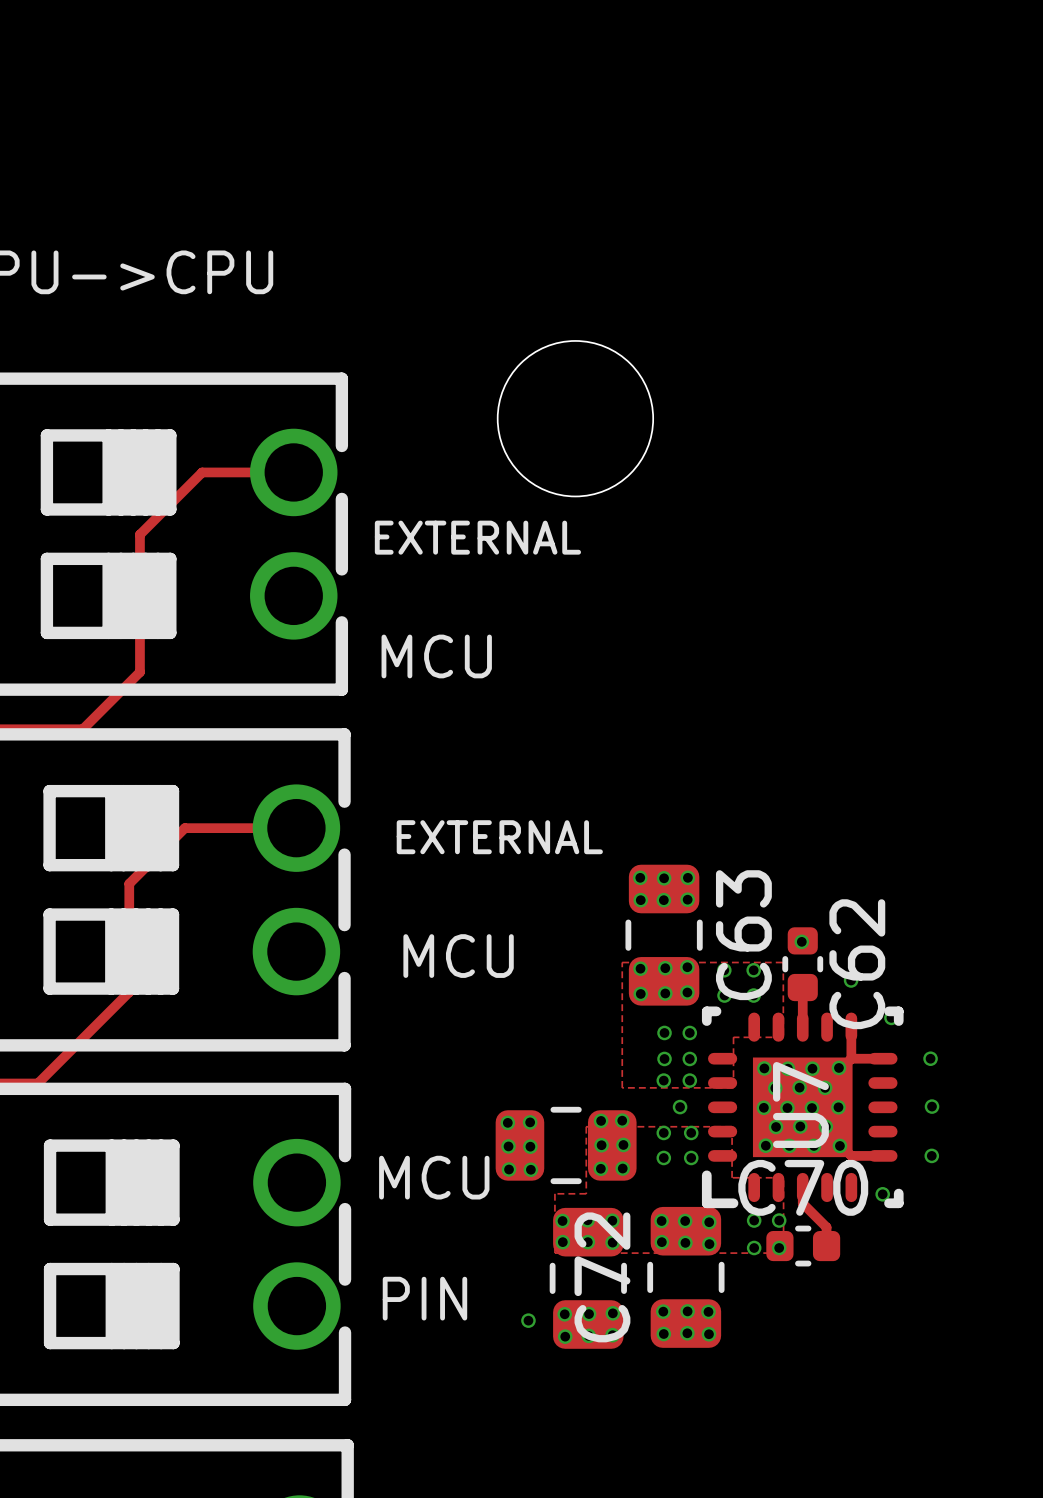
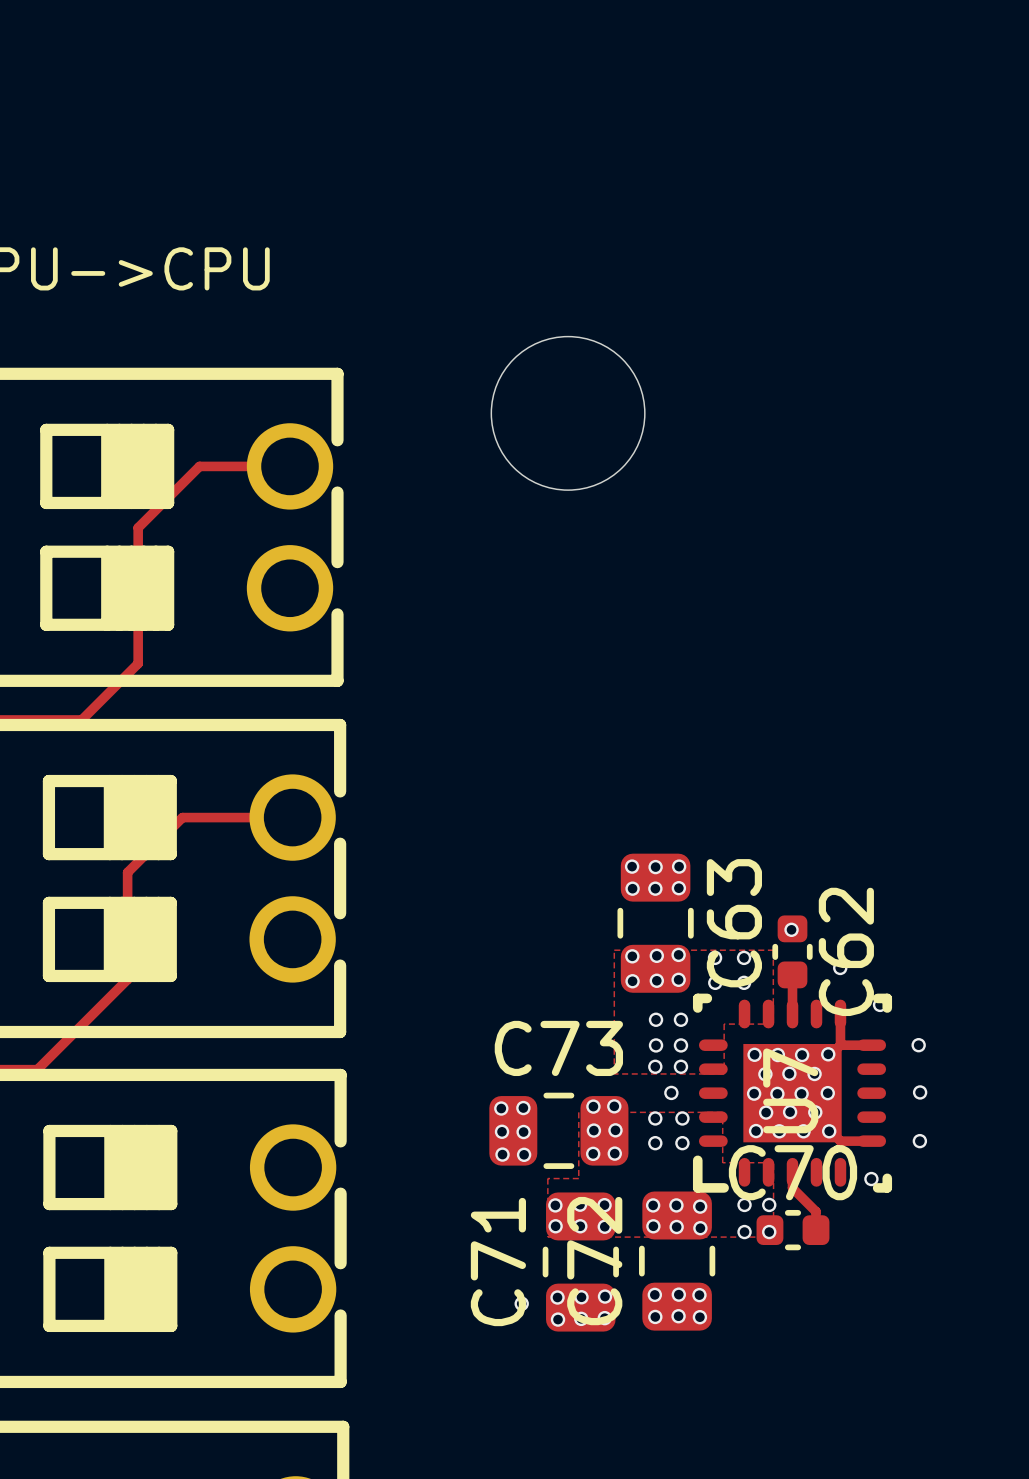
text: EXTERNAL (477, 537) -> none
text: MCU (436, 656) -> none
text: EXTERNAL (499, 837) -> none
text: MCU (458, 956) -> none
C73 name: none -> C73 (558, 1048)
text: MCU (434, 1177) -> none
C71 name: none -> C71 (498, 1262)
text: PIN (424, 1298) -> none

